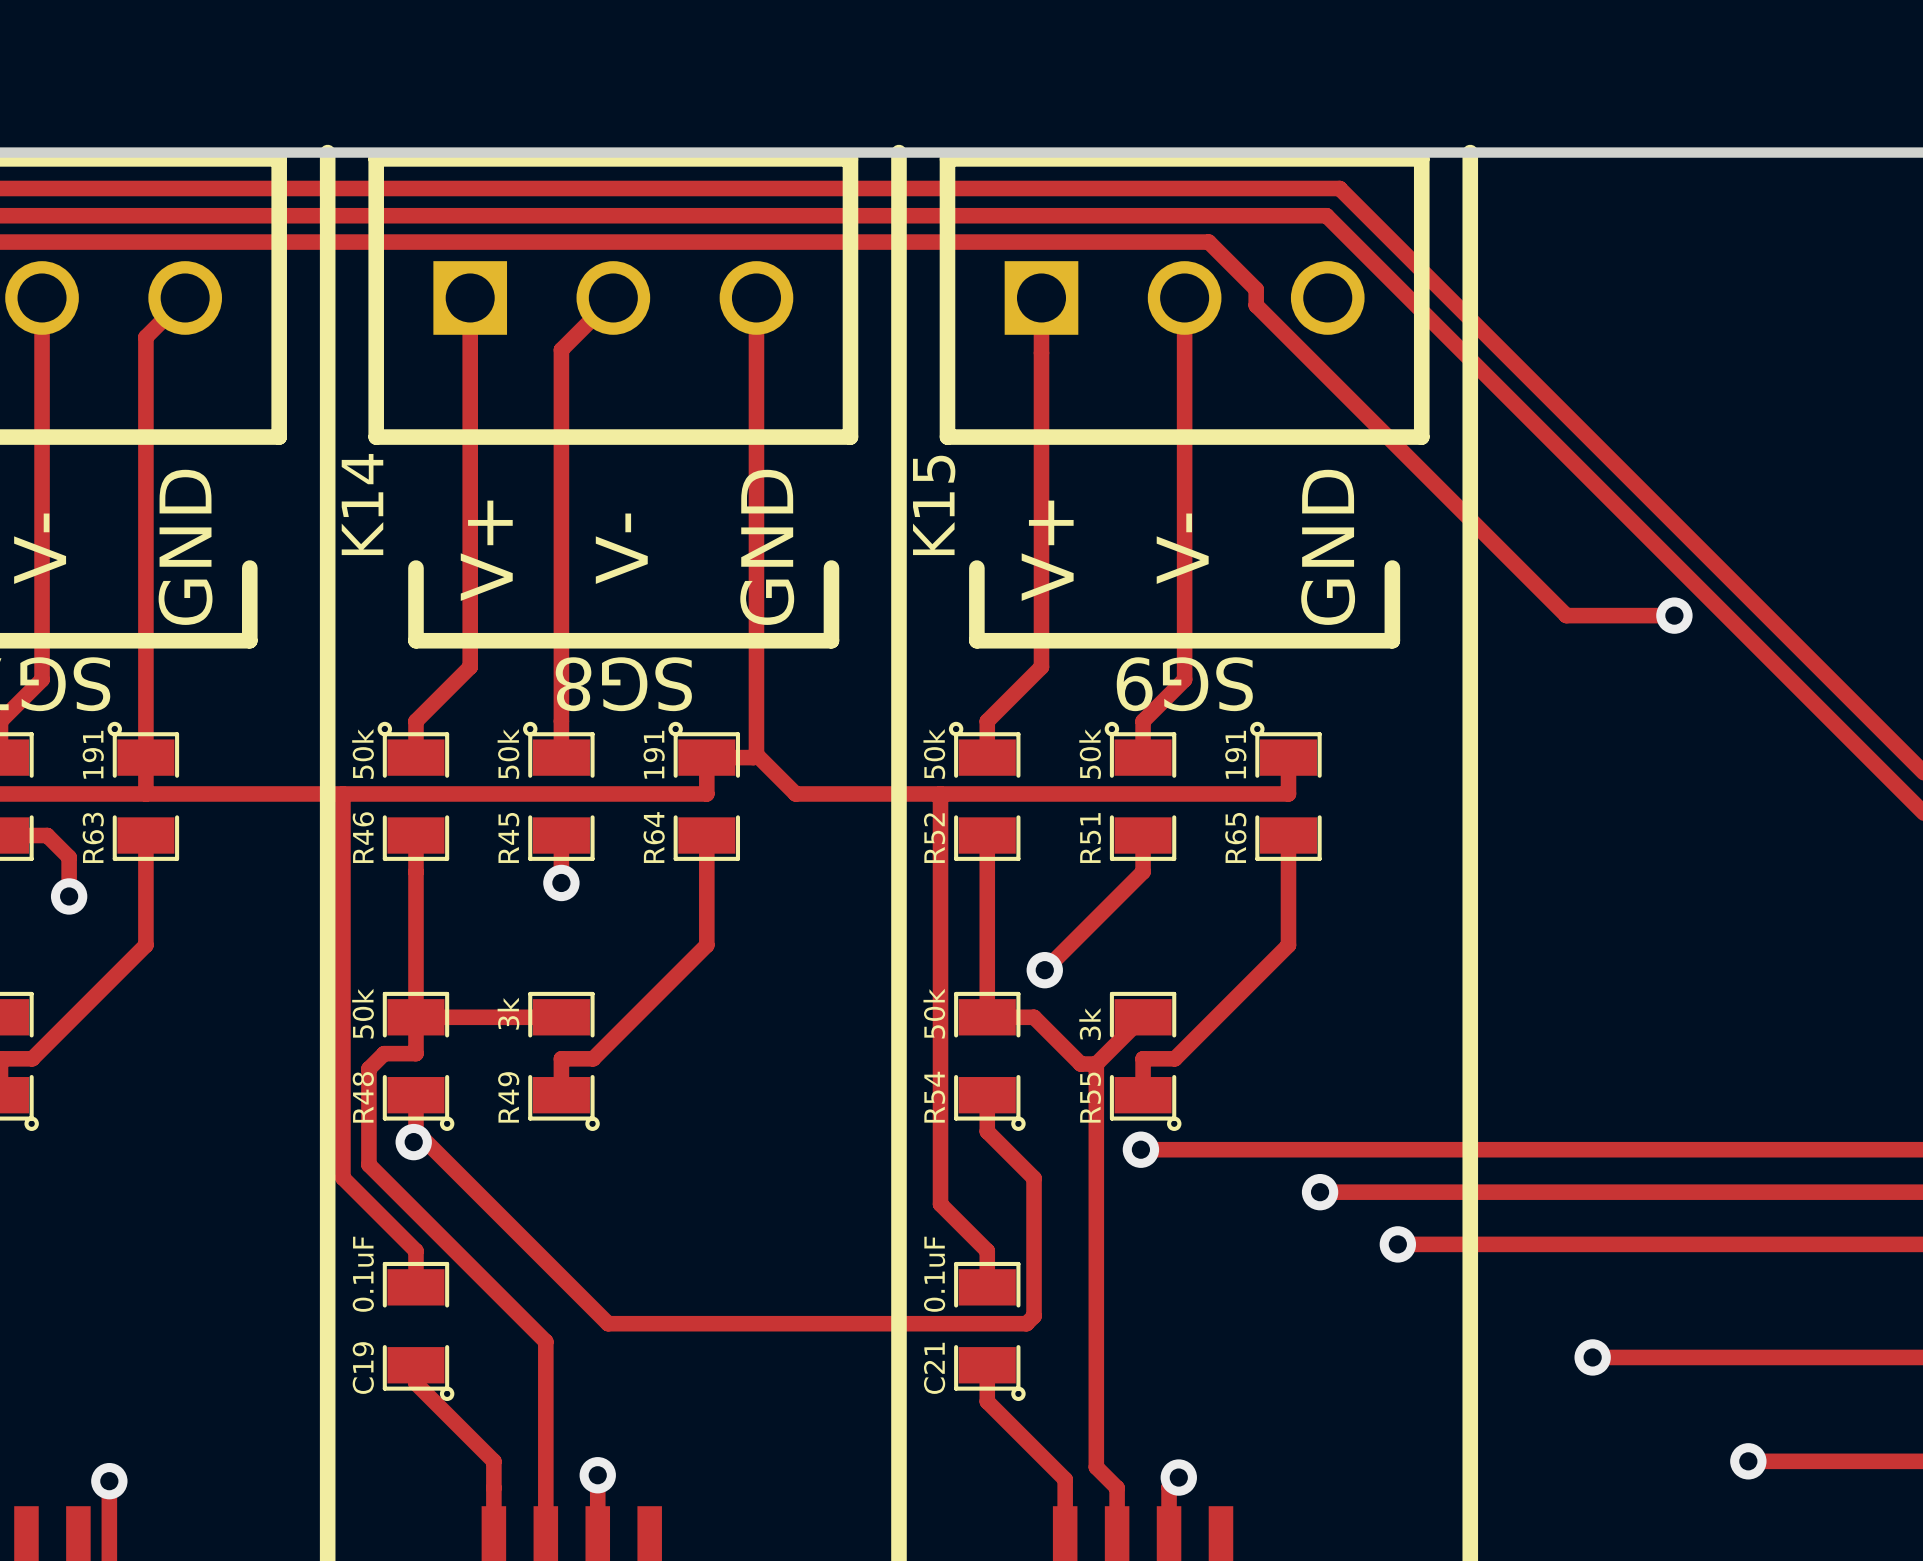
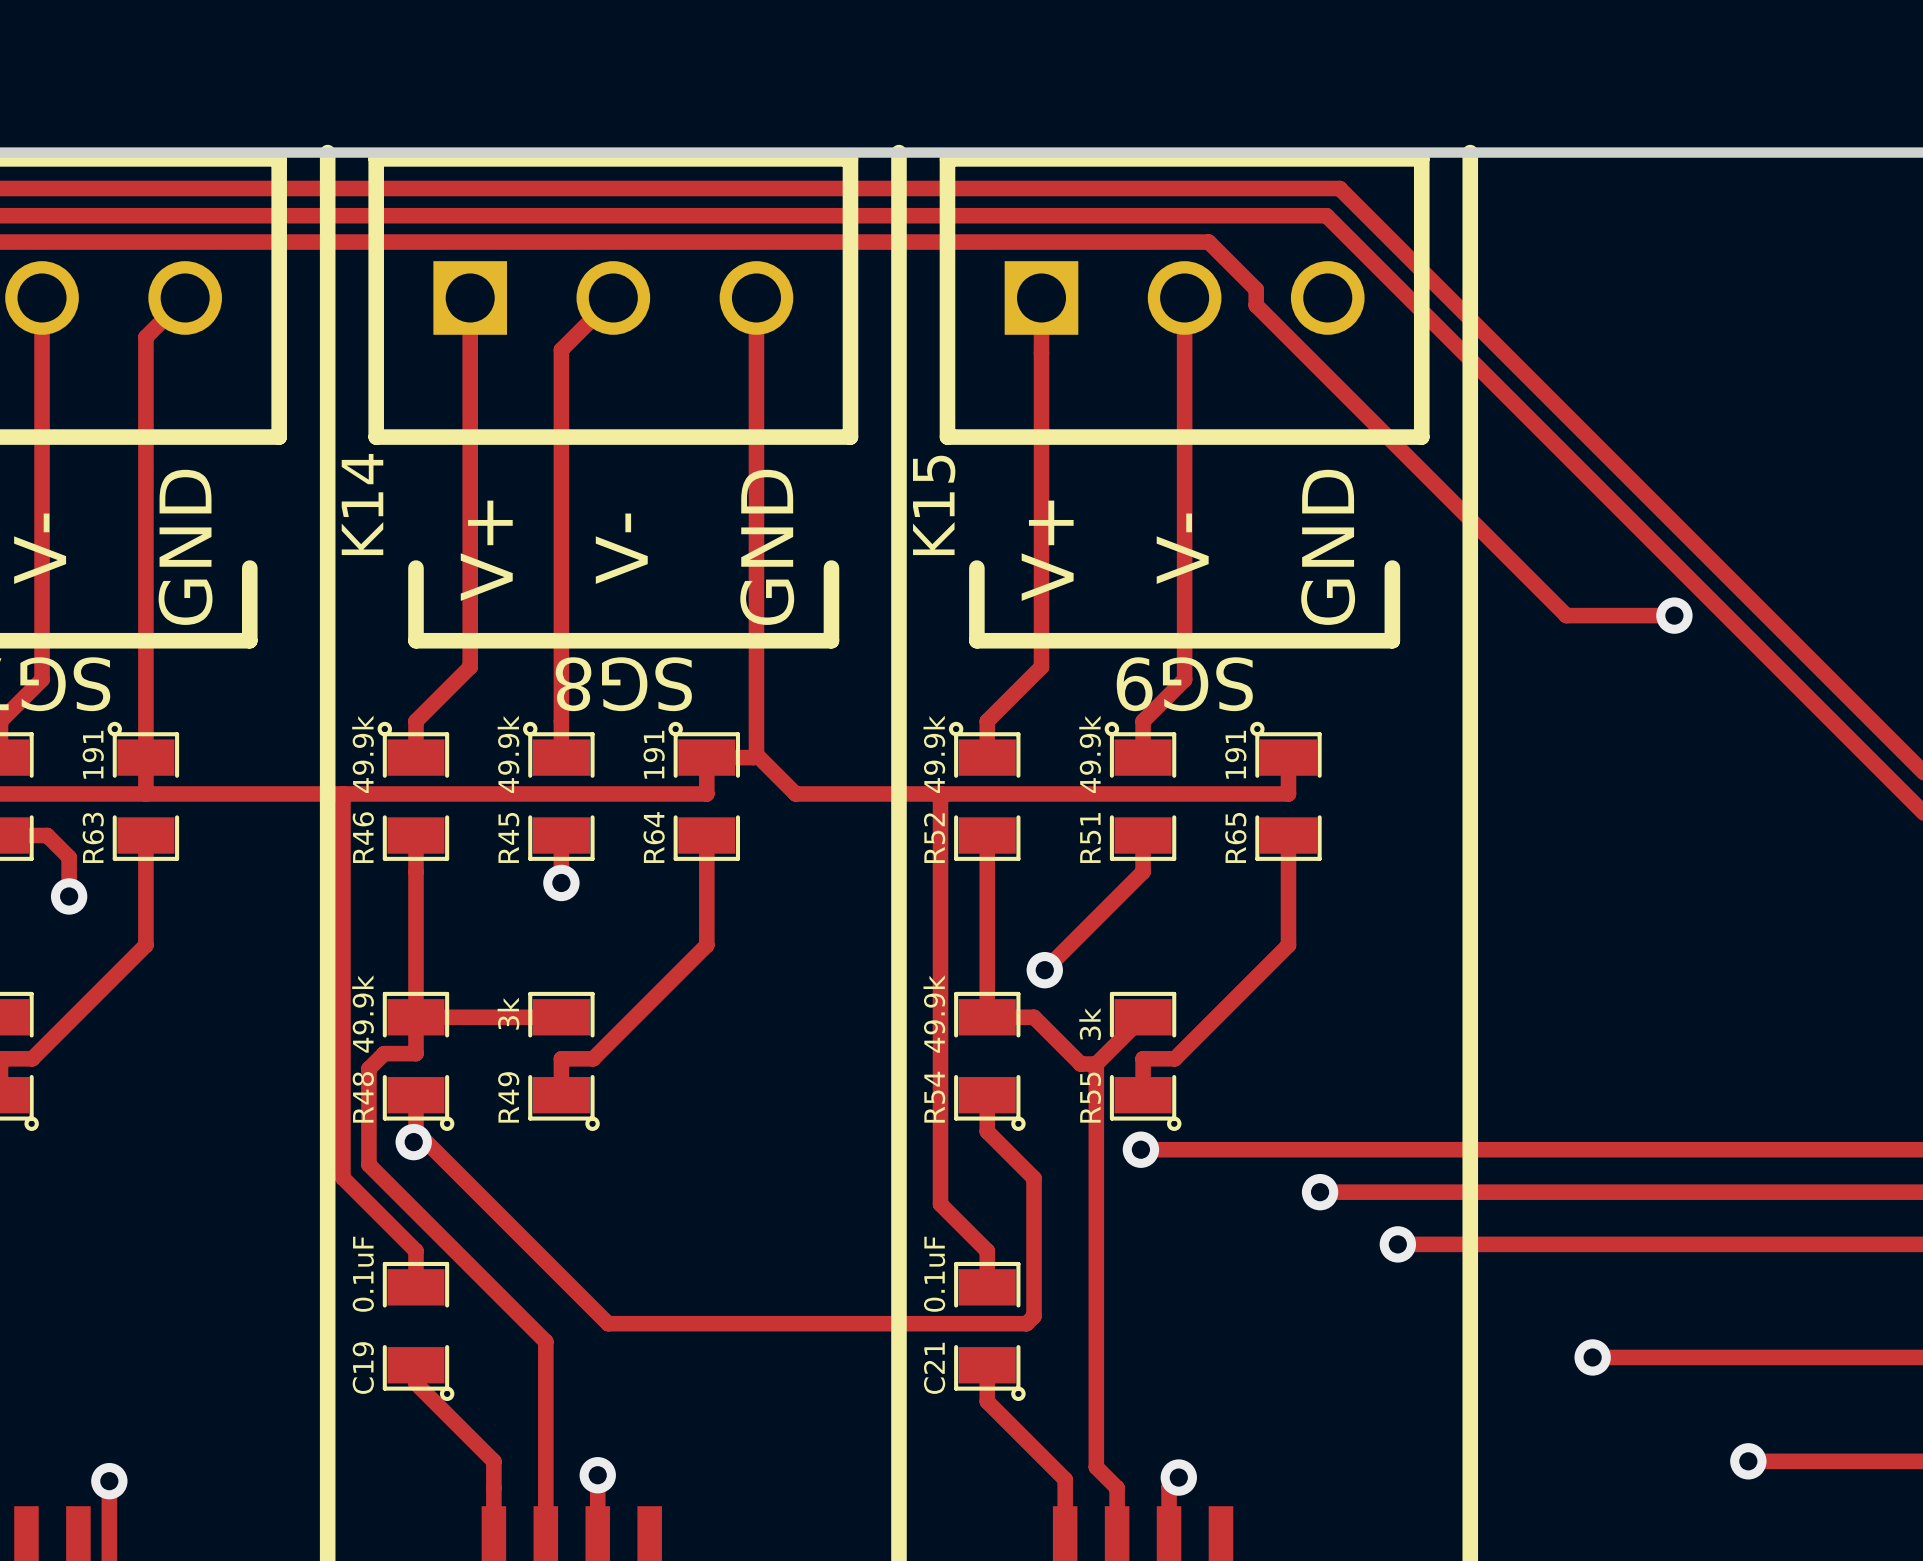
R46 value: 50k (363, 753) -> 49.9k (363, 754)
R45 value: 50k (508, 753) -> 49.9k (508, 754)
R52 value: 50k (934, 753) -> 49.9k (934, 754)
R51 value: 50k (1090, 753) -> 49.9k (1090, 754)
R48 value: 50k (363, 1013) -> 49.9k (363, 1014)
R54 value: 50k (934, 1013) -> 49.9k (934, 1014)

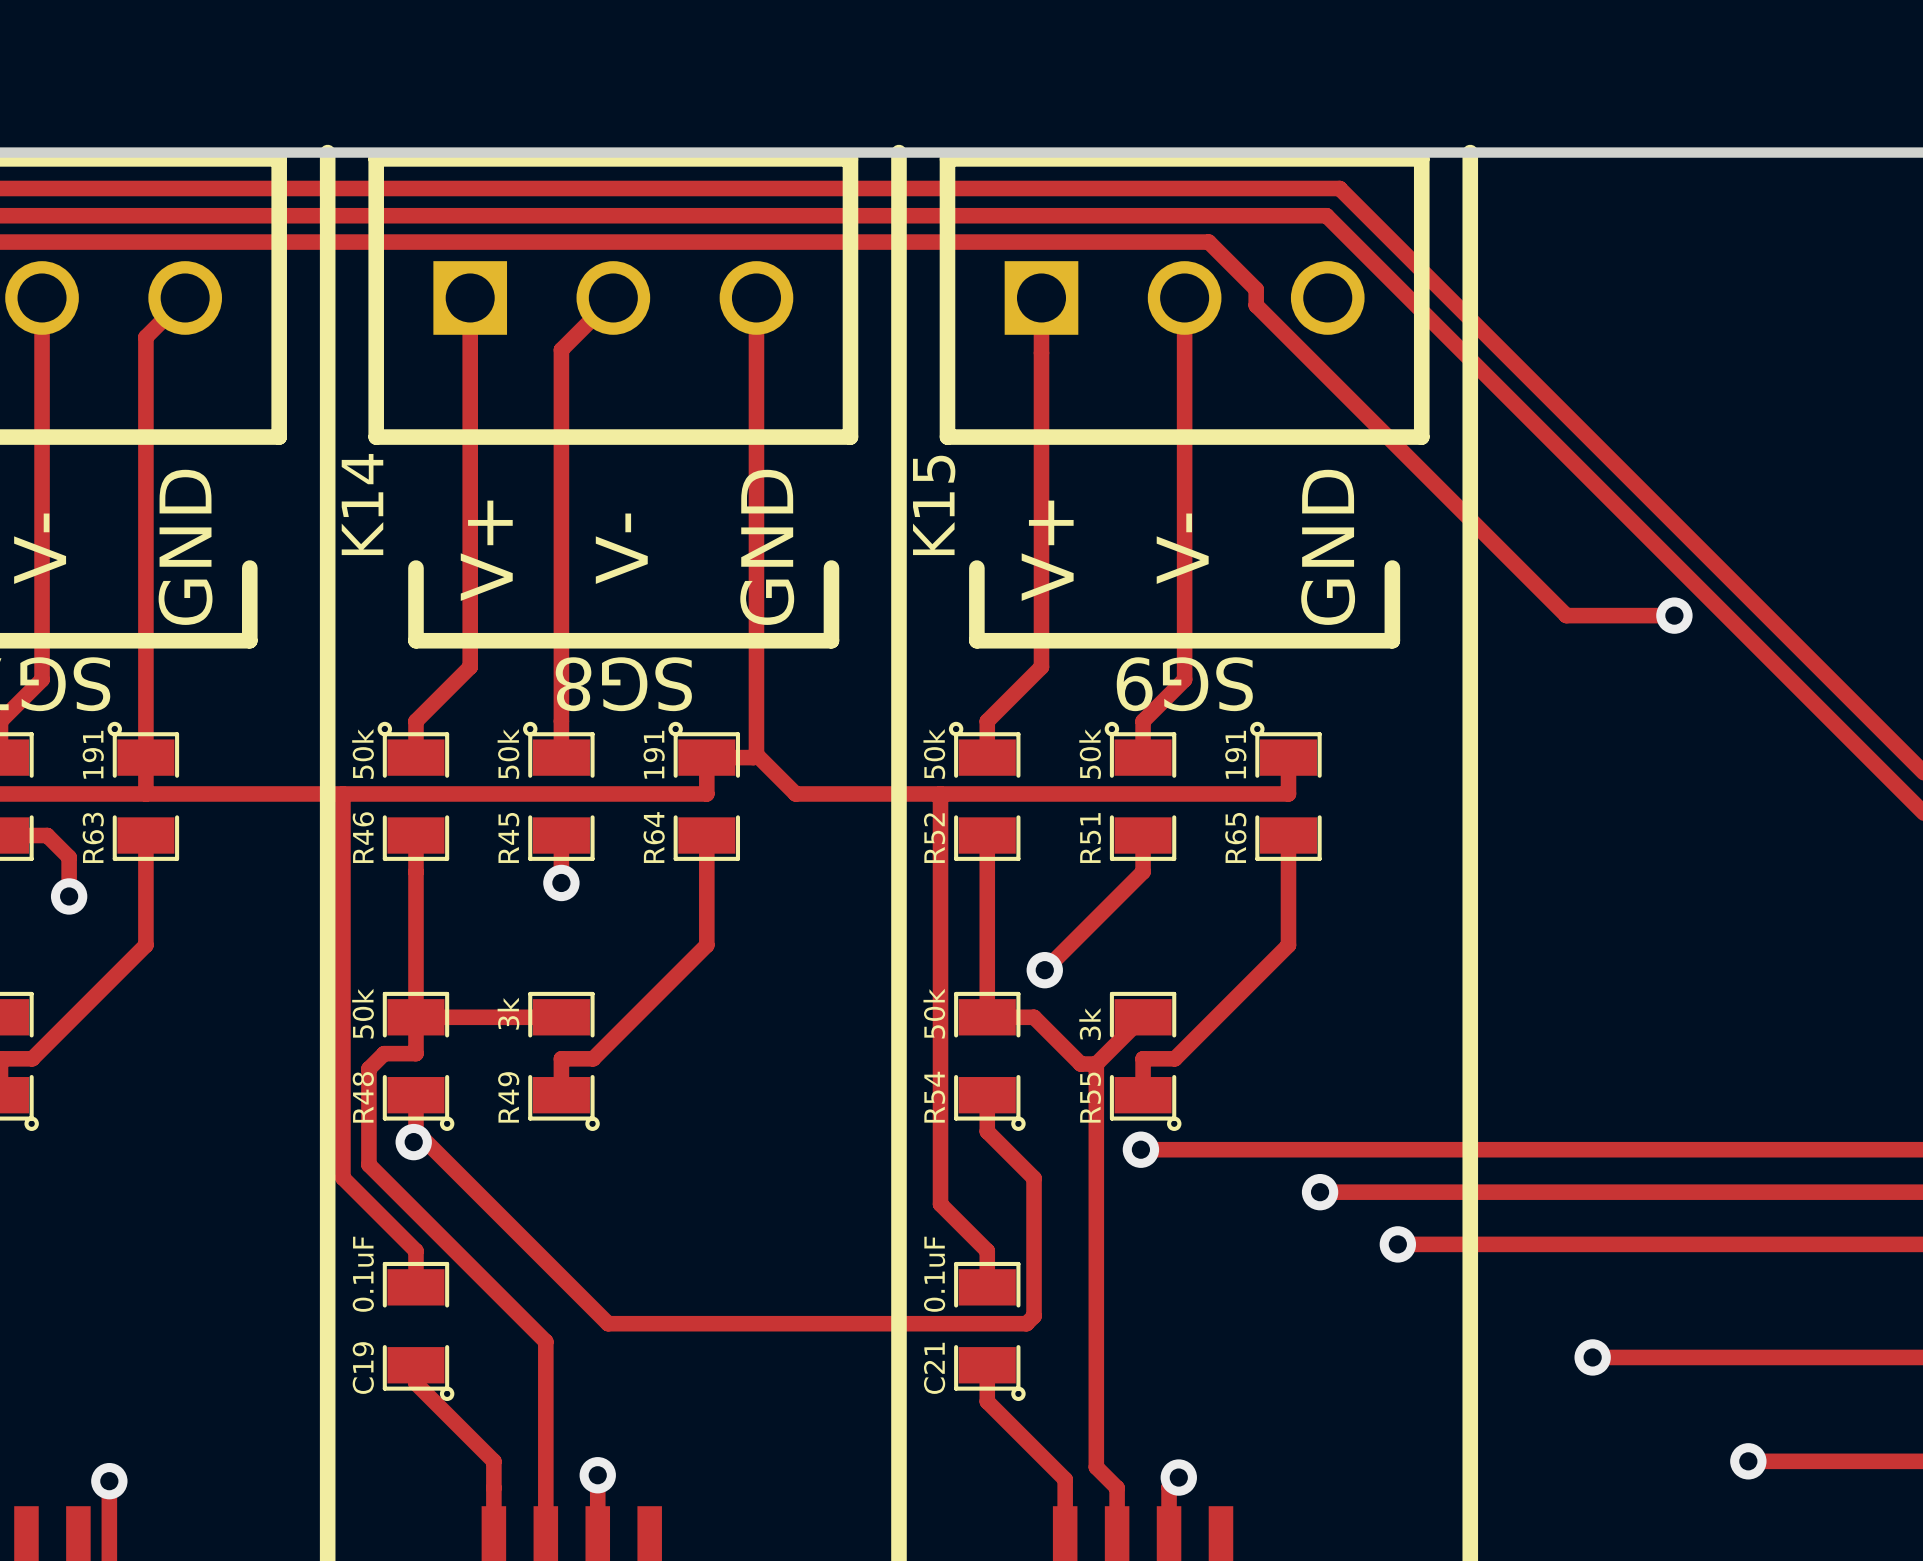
R46 value: 49.9k (363, 754) -> 50k (363, 753)
R45 value: 49.9k (508, 754) -> 50k (508, 753)
R52 value: 49.9k (934, 754) -> 50k (934, 753)
R51 value: 49.9k (1090, 754) -> 50k (1090, 753)
R48 value: 49.9k (363, 1014) -> 50k (363, 1013)
R54 value: 49.9k (934, 1014) -> 50k (934, 1013)

